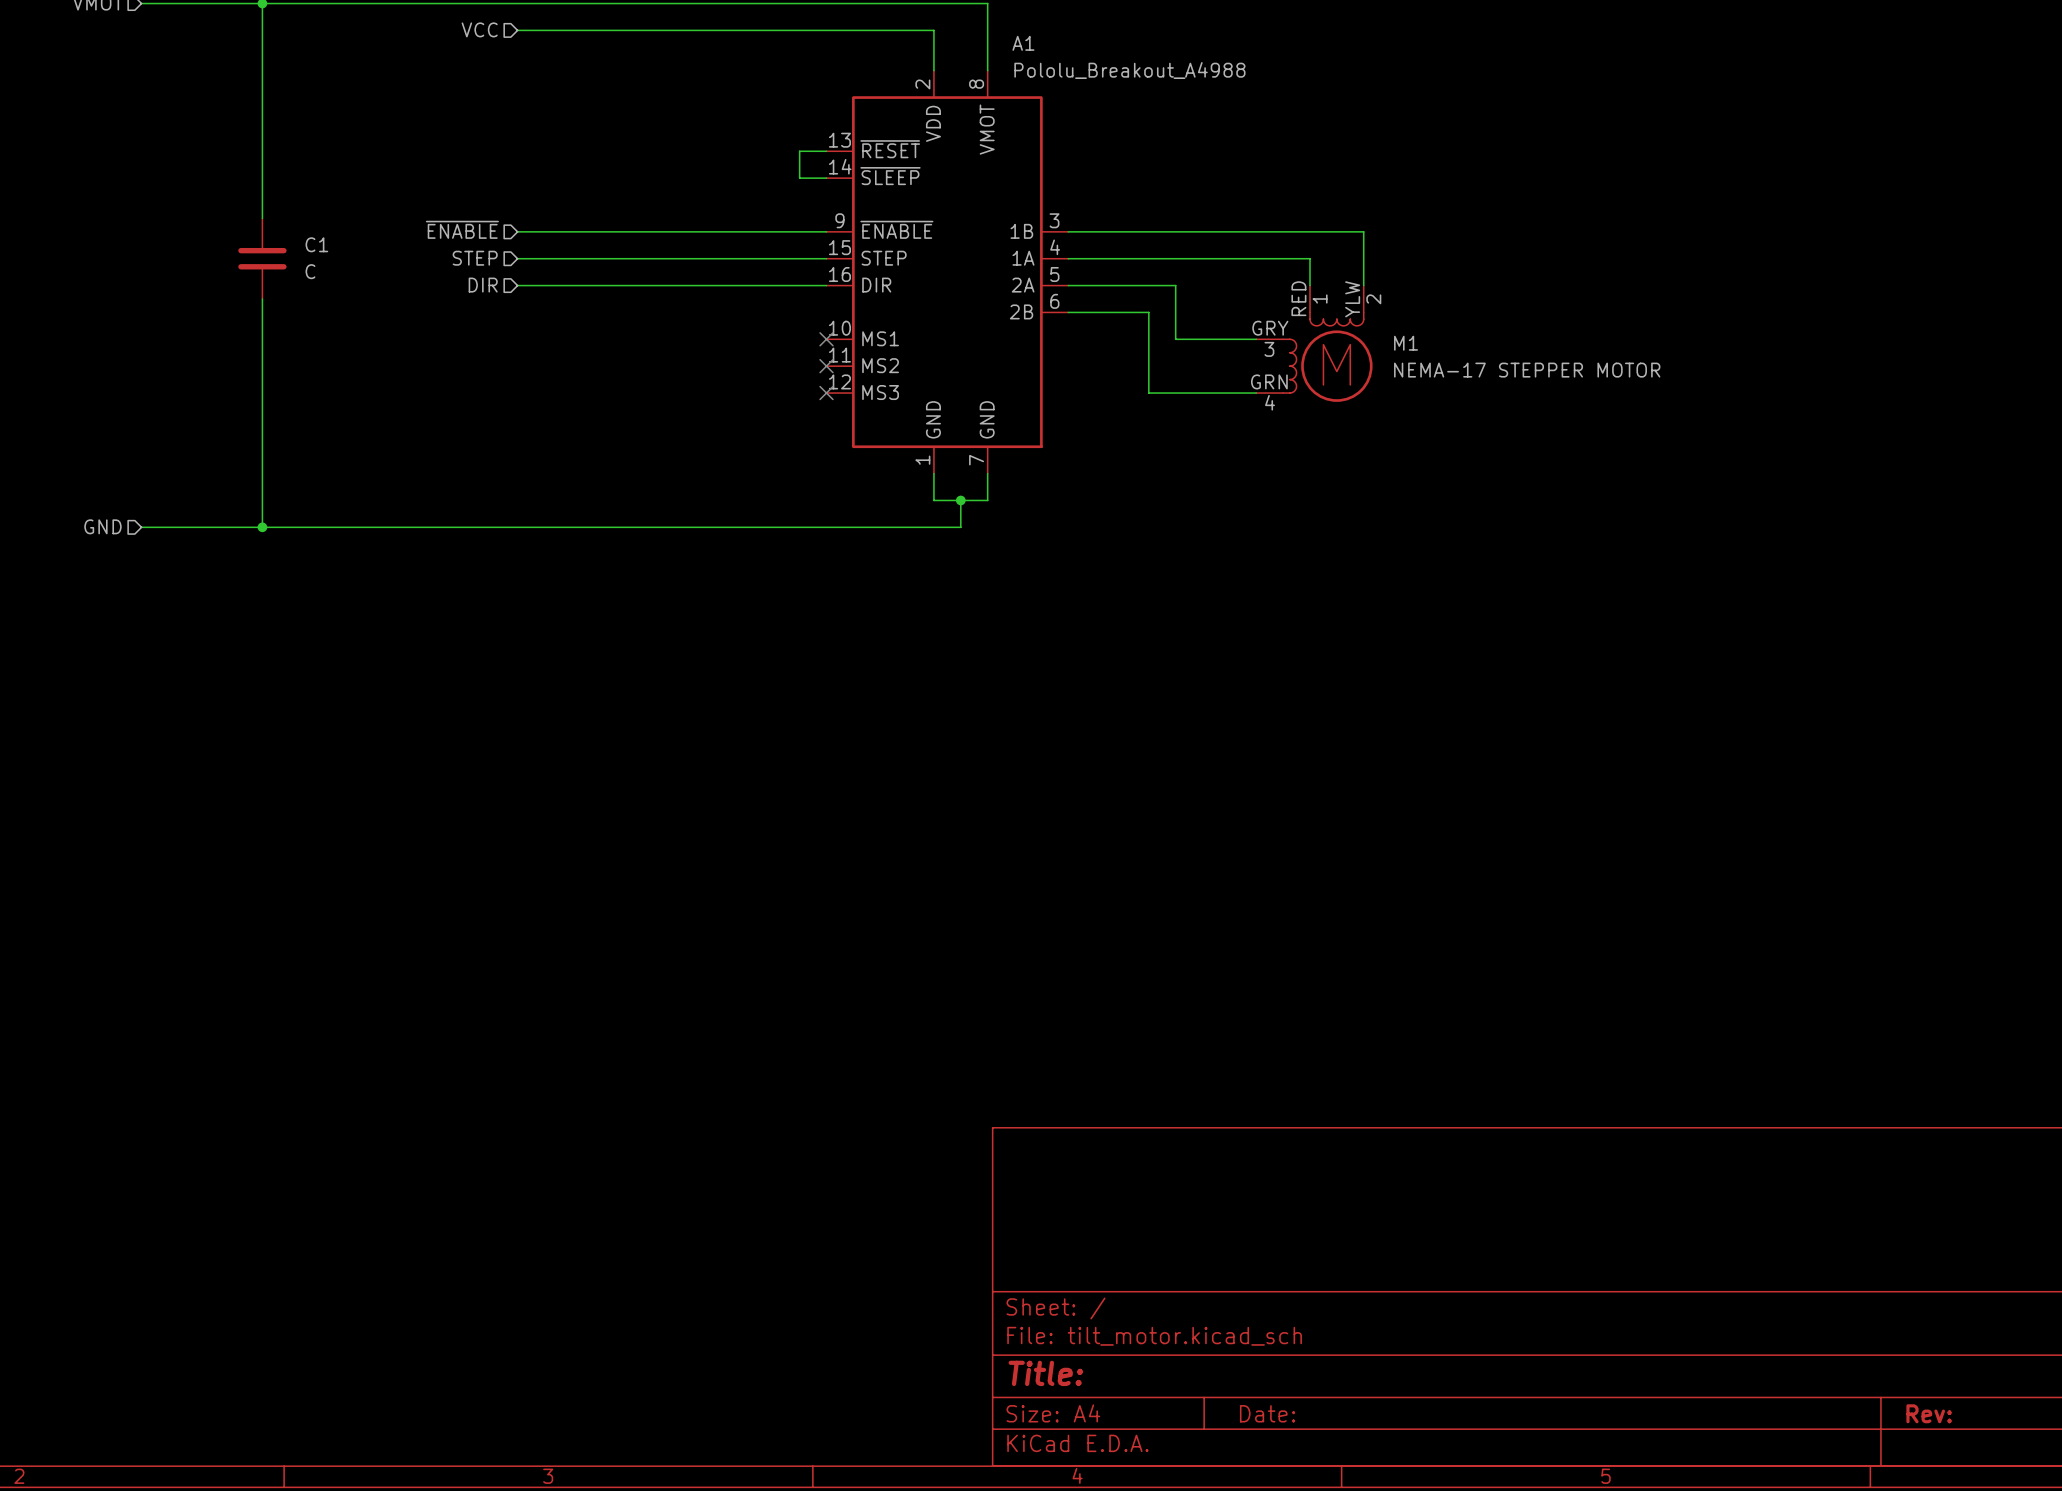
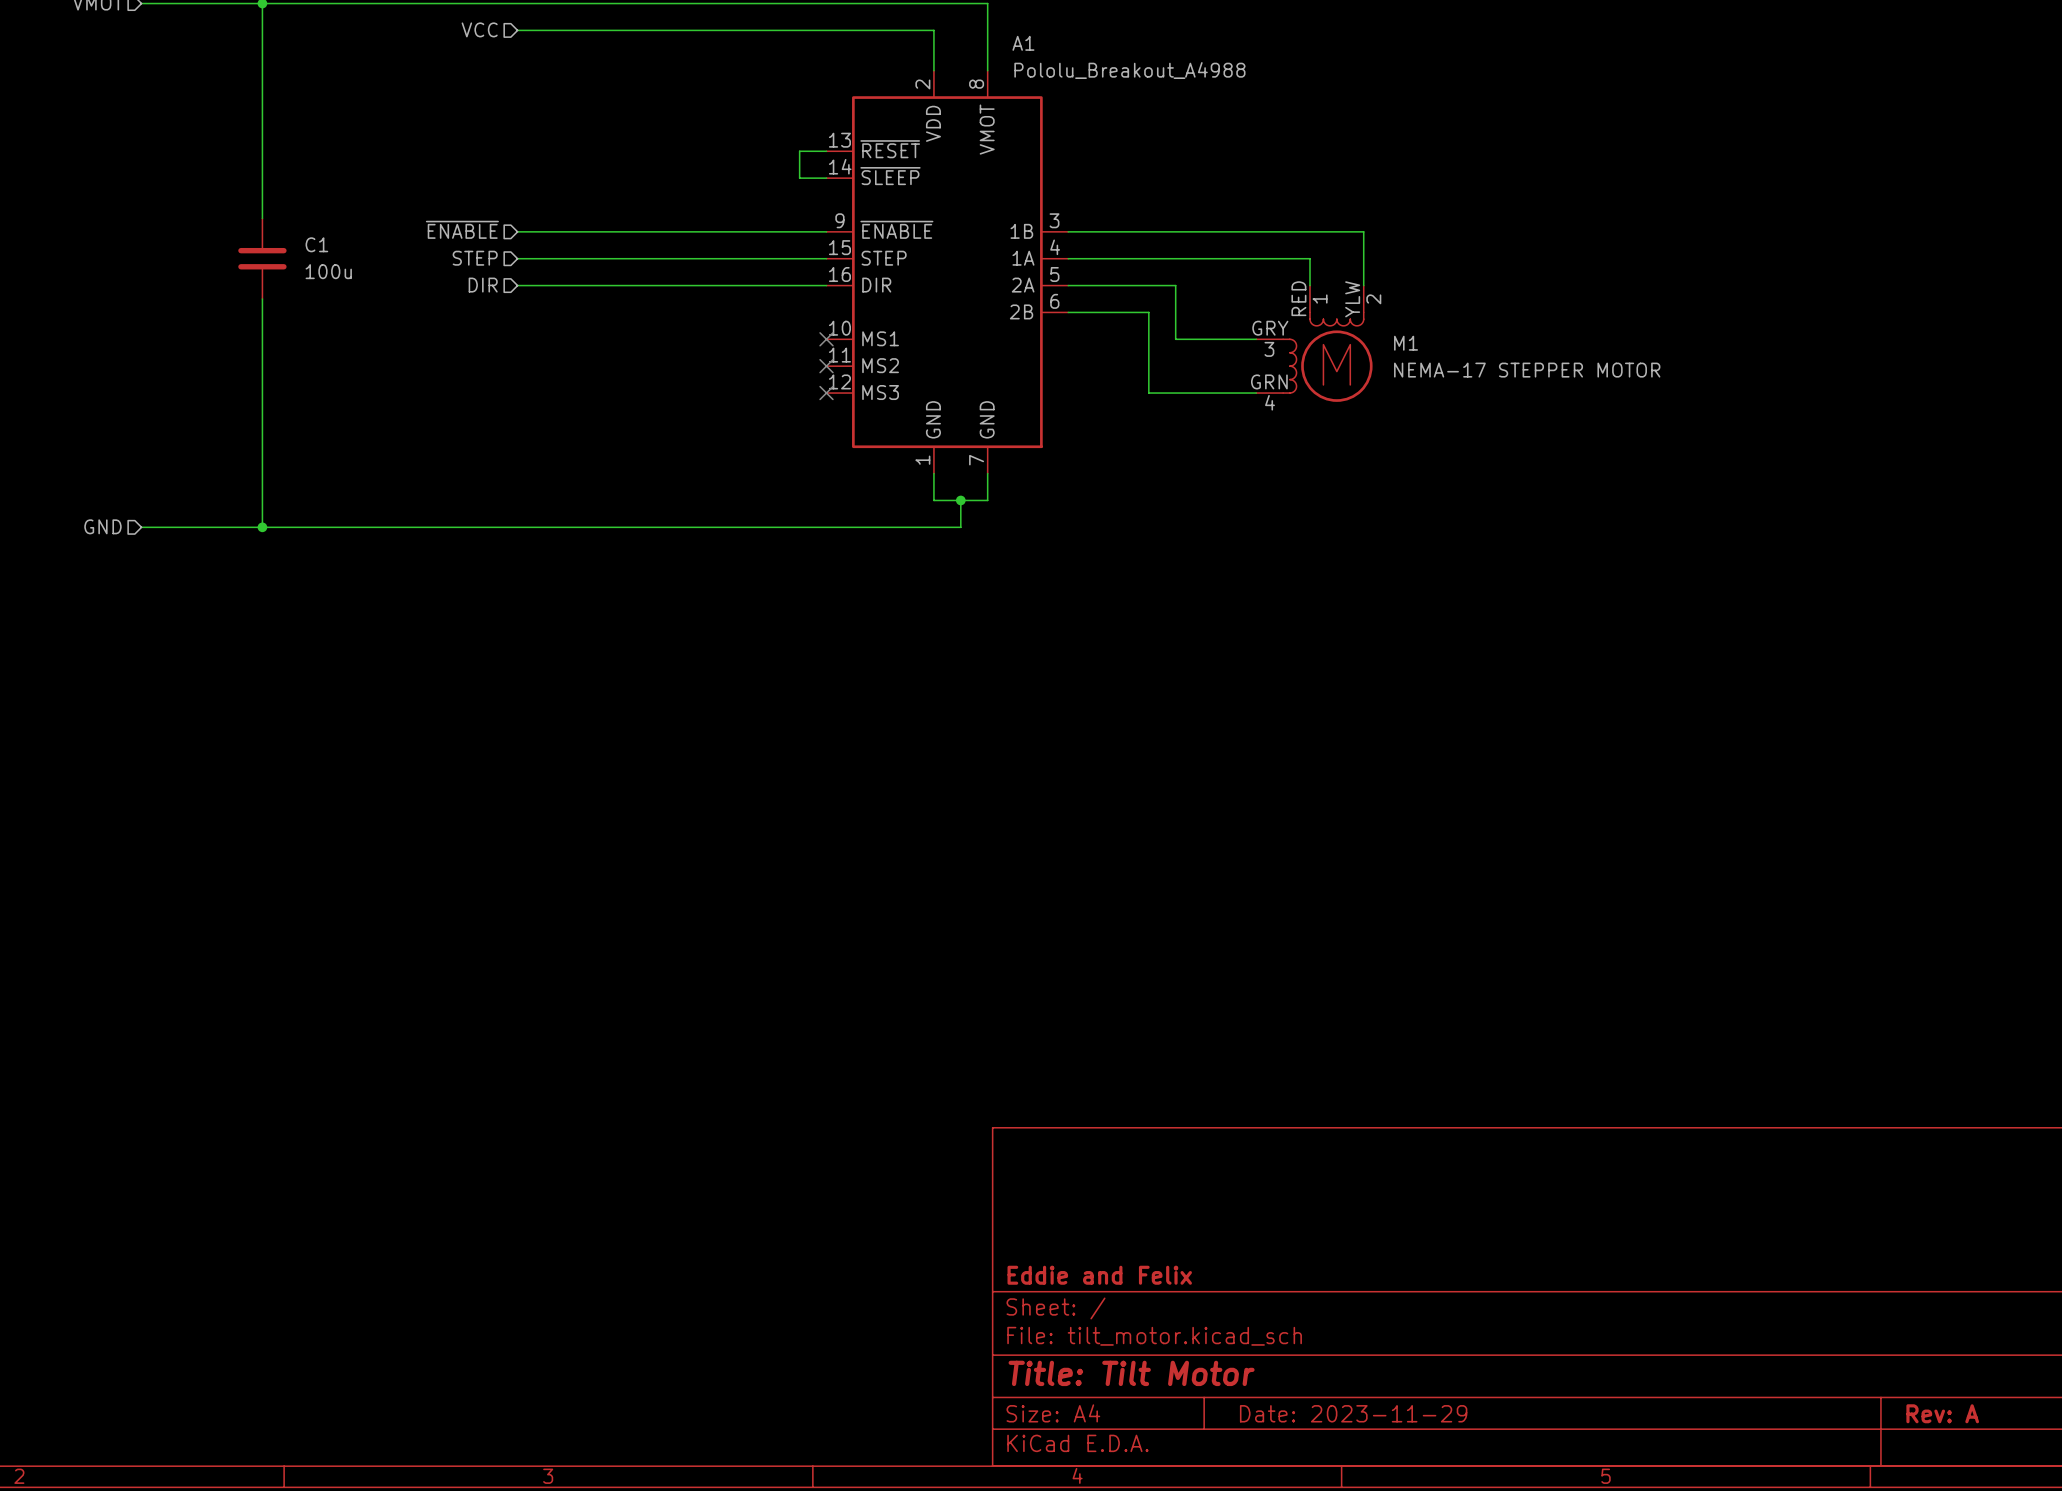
C1 value: C (310, 271) -> 100u (328, 271)
title block: none -> Eddie and Felix (1099, 1275)
title block: Title: (1045, 1373) -> Title: Tilt Motor (1131, 1373)
title block: Date: (1267, 1413) -> Date: 2023-11-29 (1353, 1413)
title block: Rev: (1929, 1413) -> Rev: A (1942, 1413)

